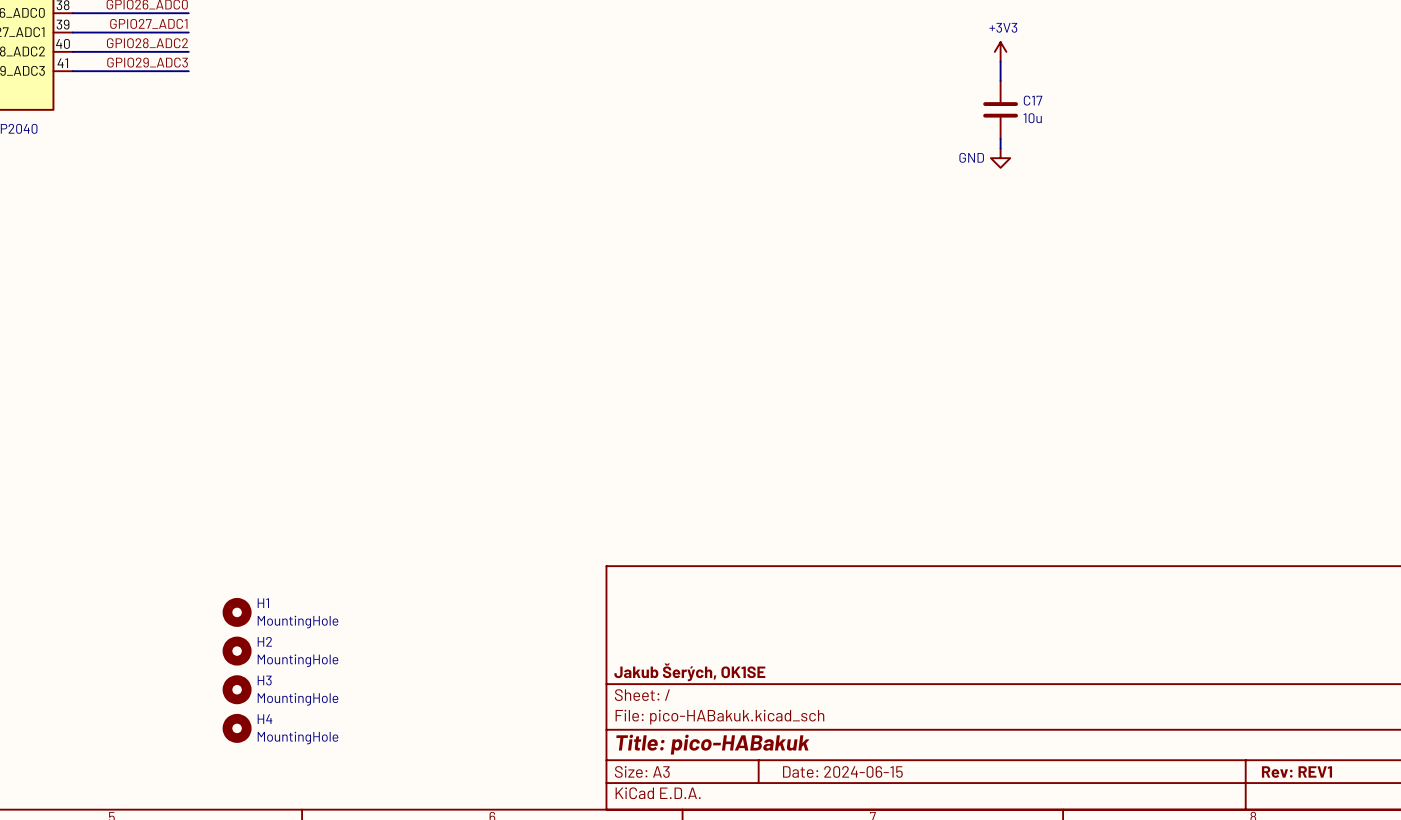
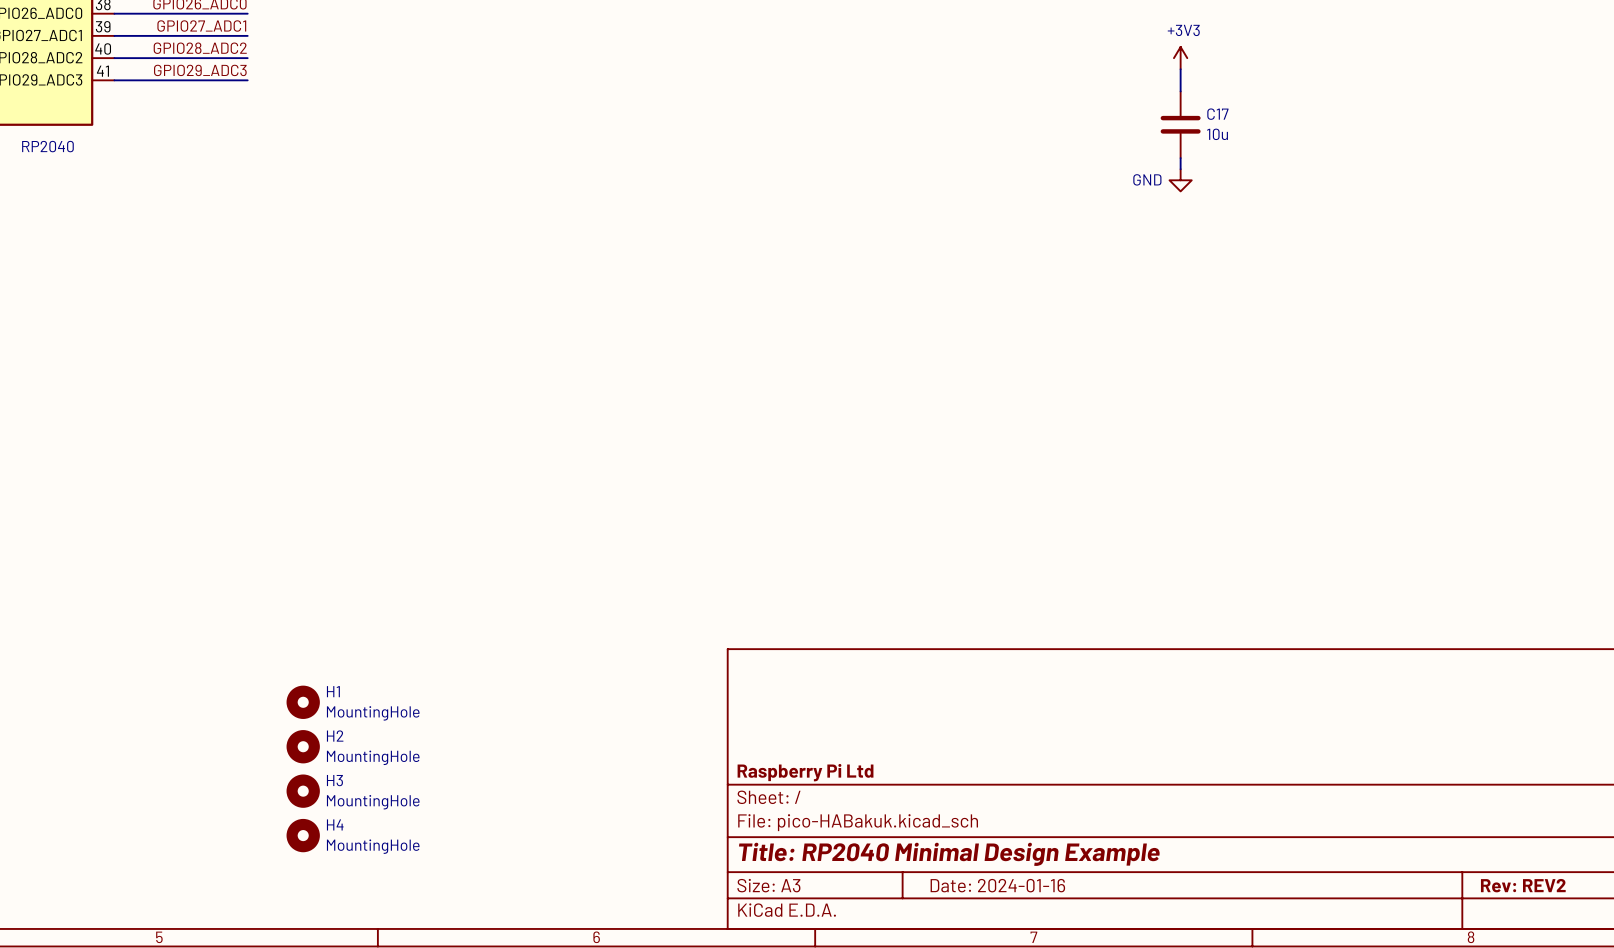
title block: Jakub Šerých, OK1SE (689, 672) -> Raspberry Pi Ltd (805, 772)
title block: Title: pico-HABakuk (712, 744) -> Title: RP2040 Minimal Design Example (949, 854)
title block: Date: 2024-06-15 (842, 771) -> Date: 2024-01-16 (997, 885)
title block: Rev: REV1 (1296, 772) -> Rev: REV2 (1523, 885)

